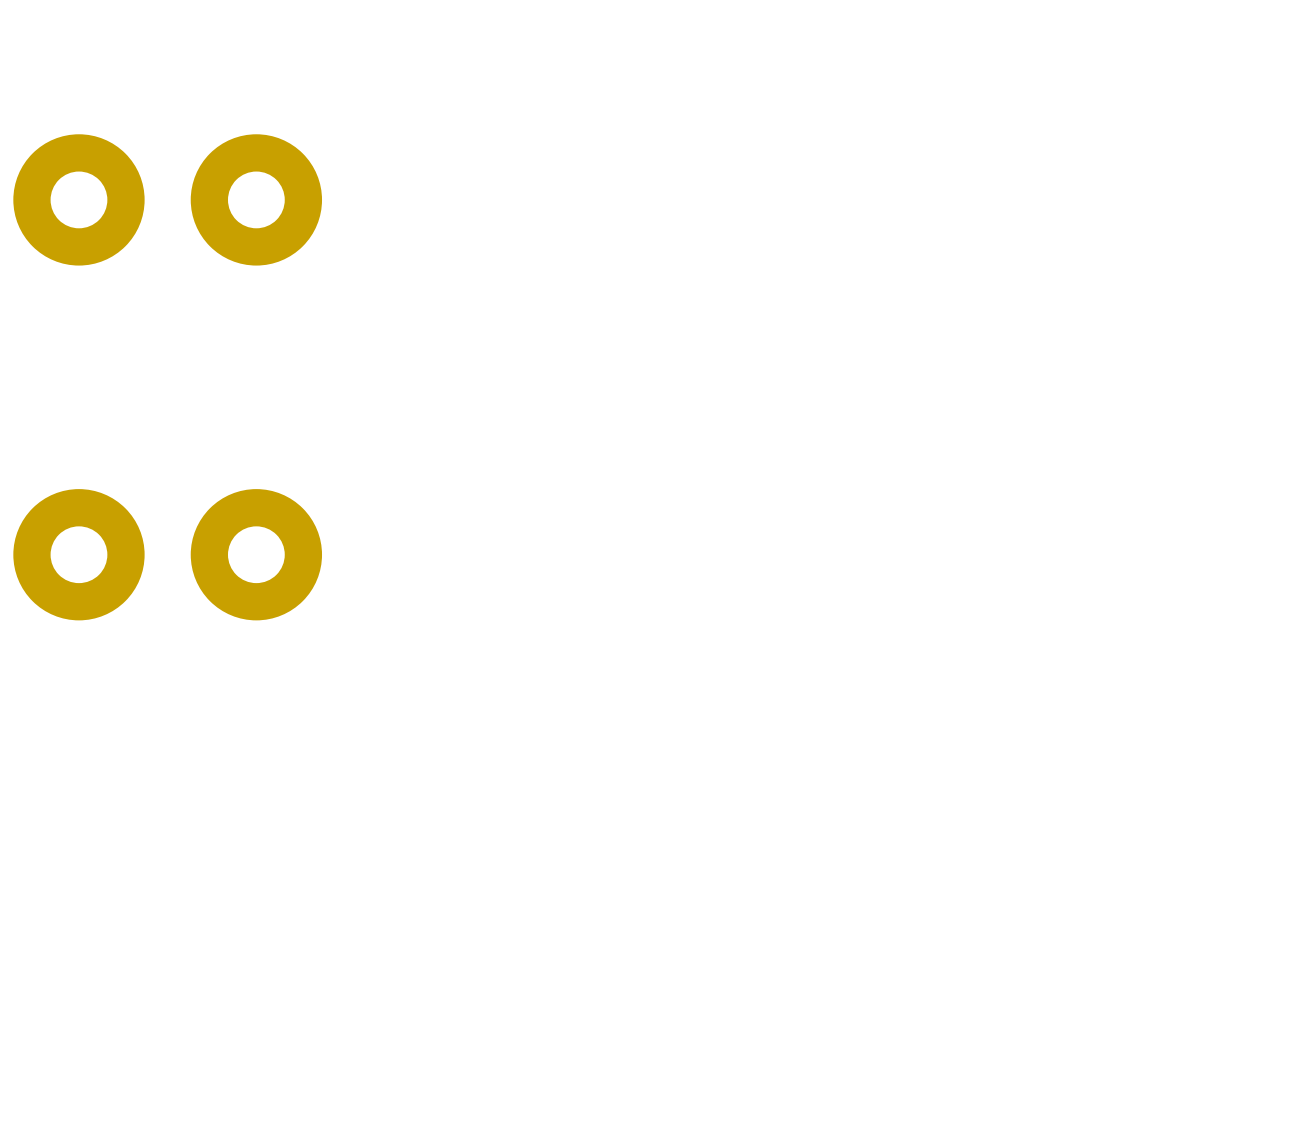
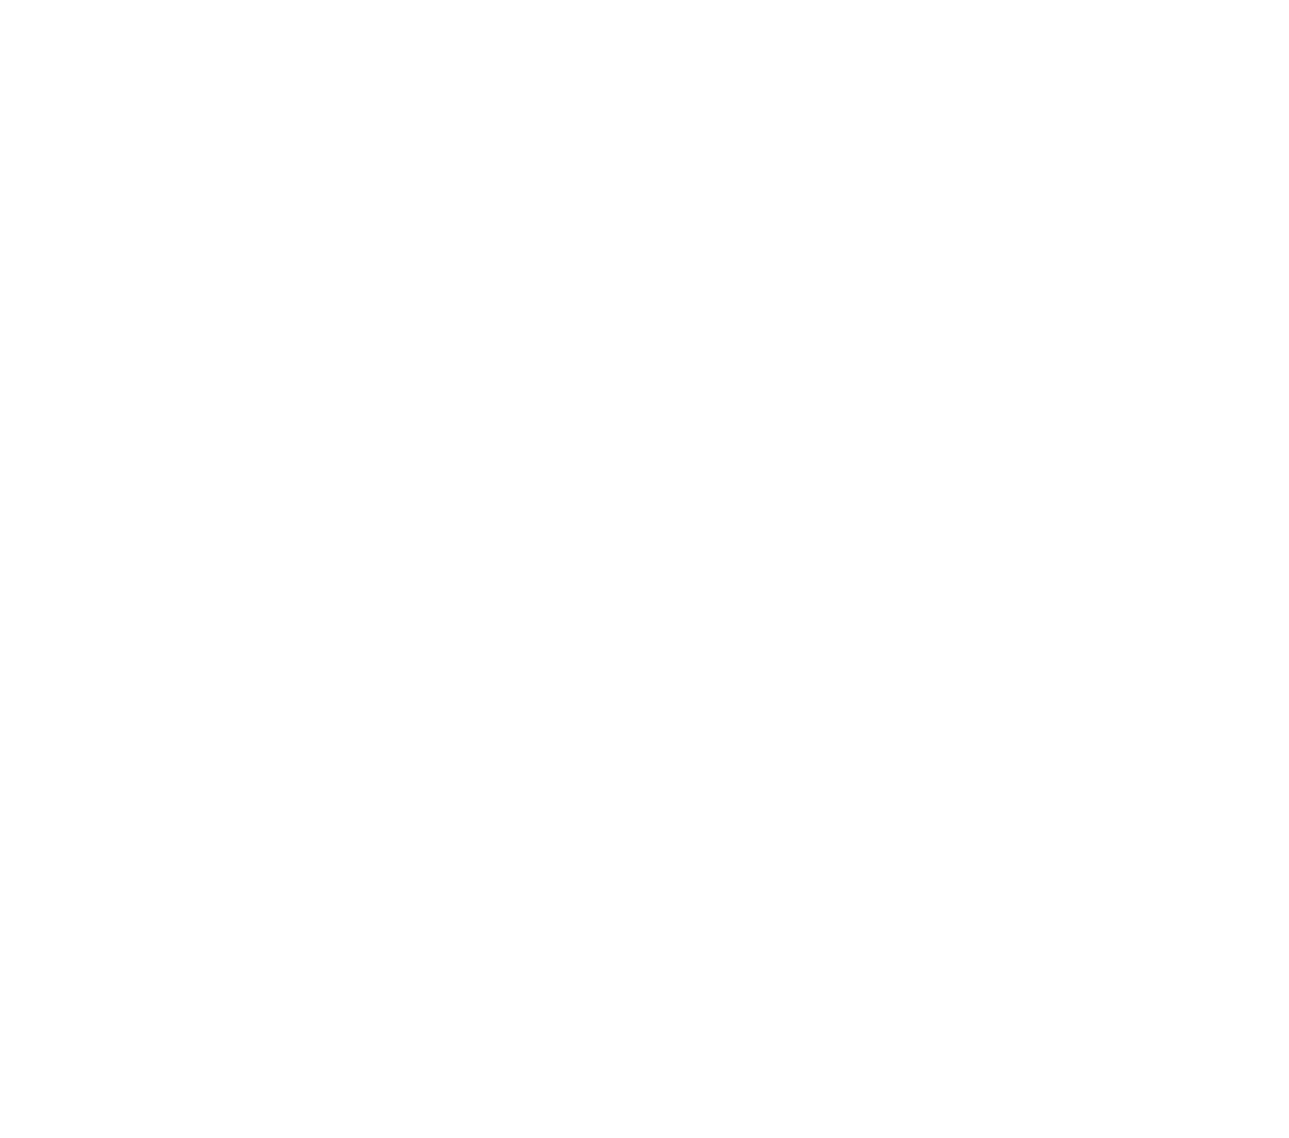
part: (167, 199) -> none
part: (167, 554) -> none

